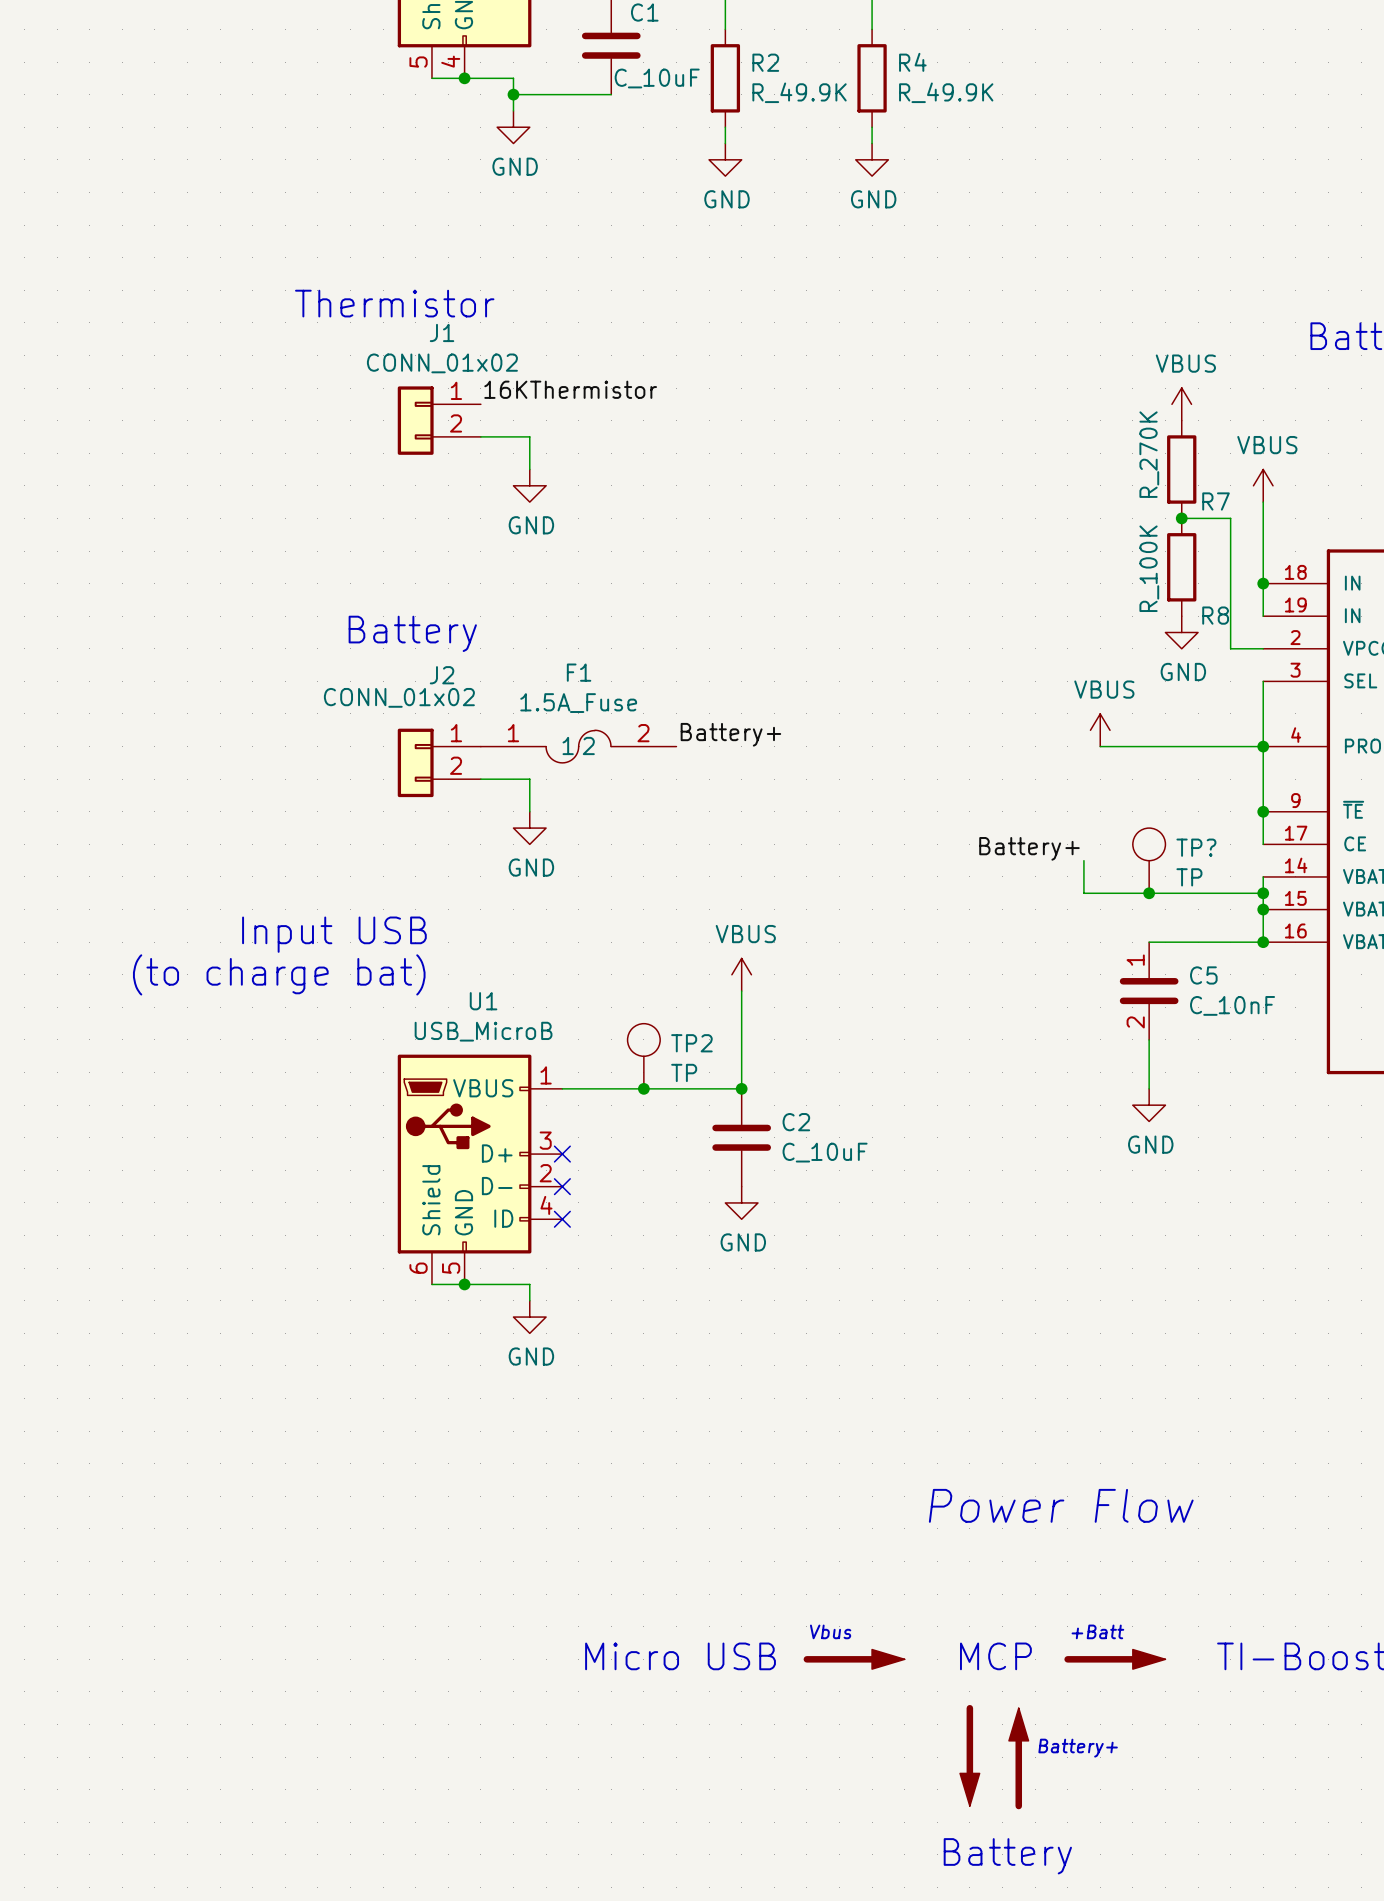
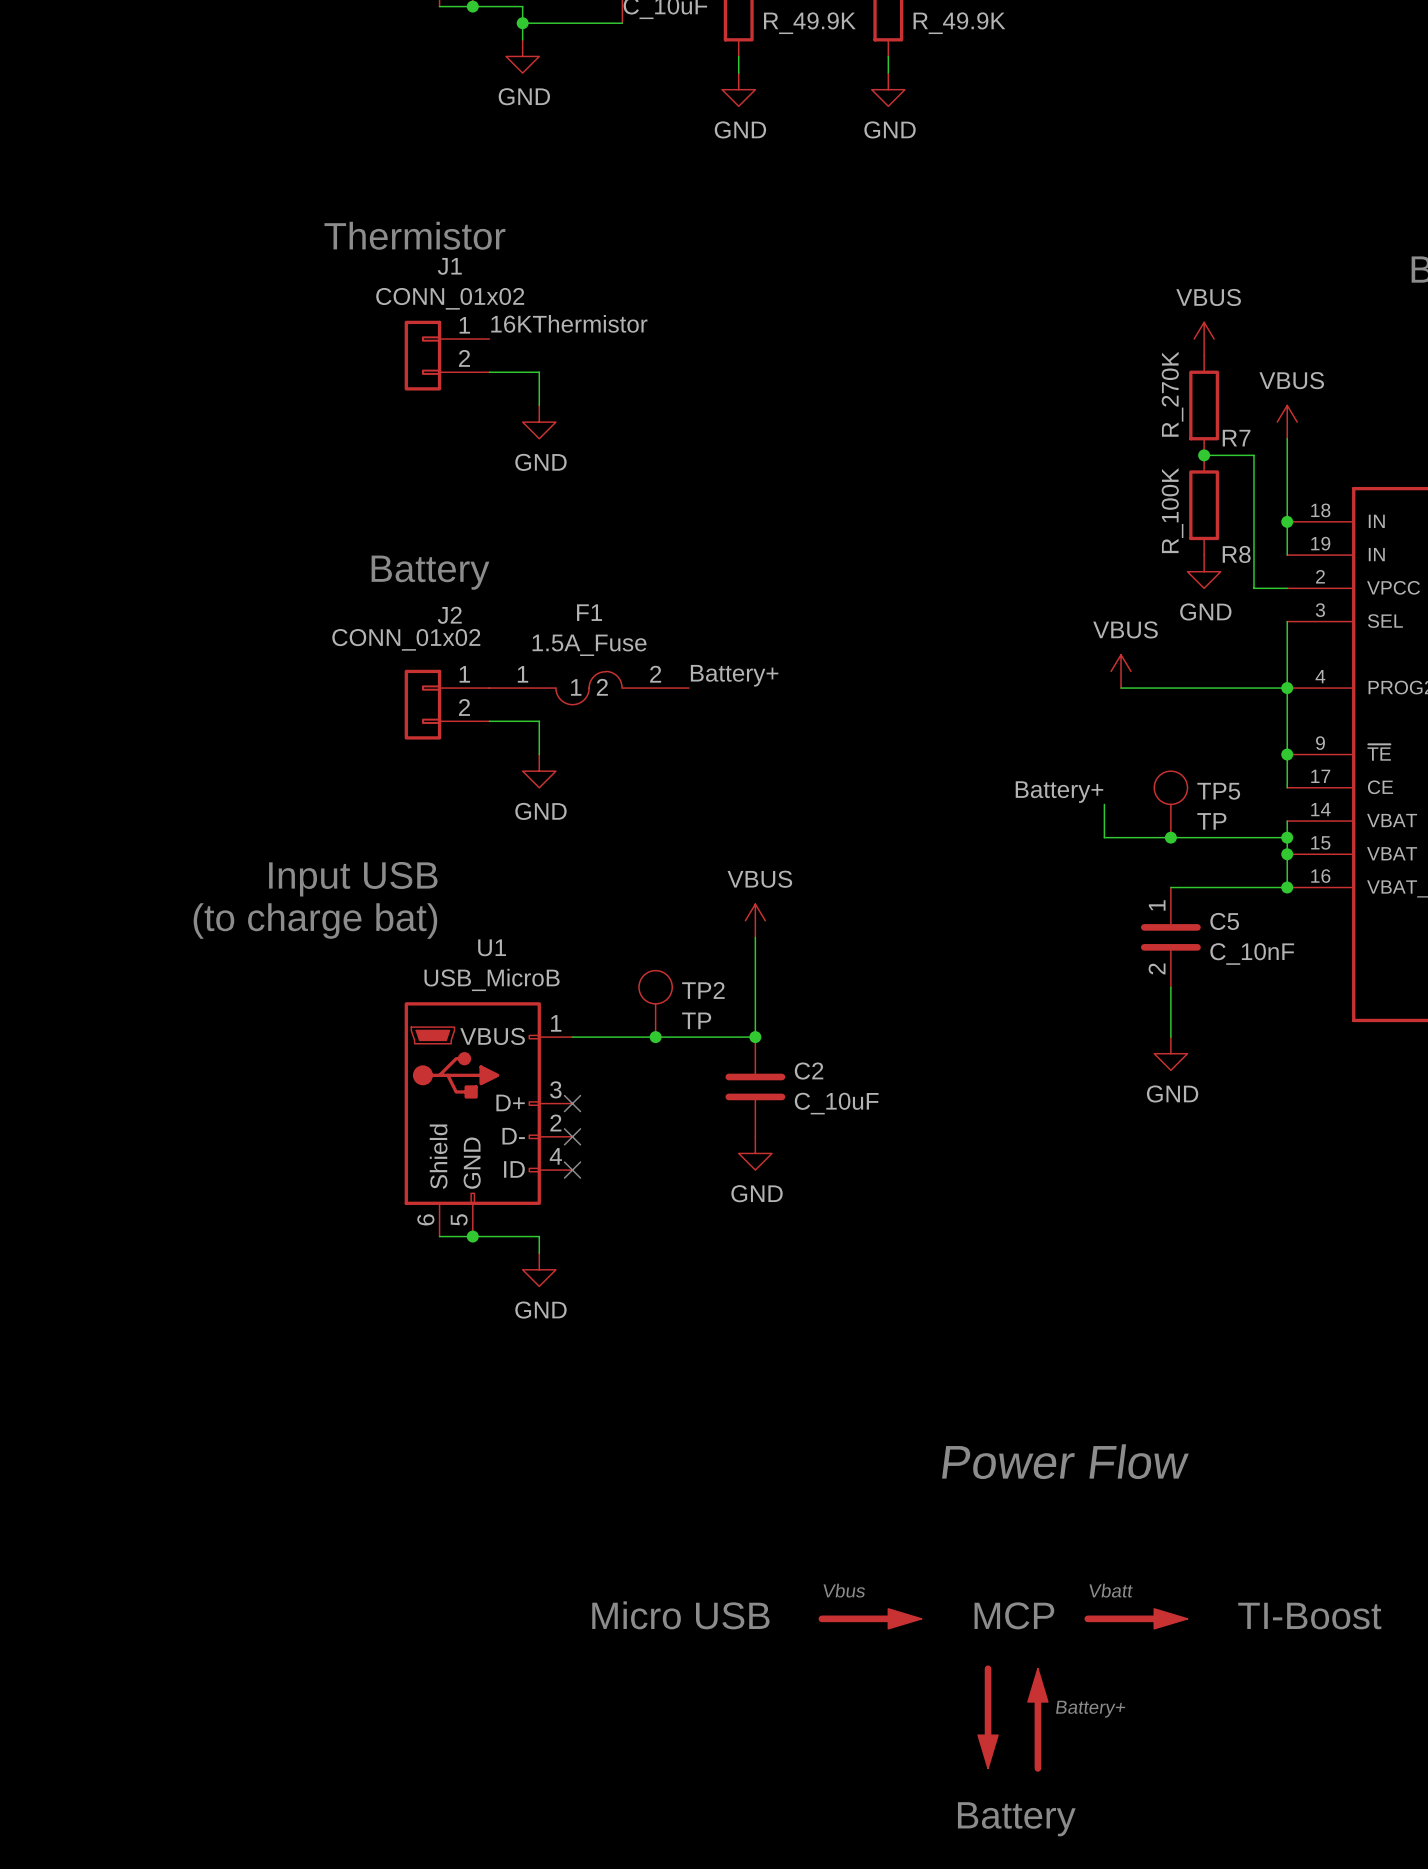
TP? name: TP? (1196, 847) -> TP5 (1218, 791)
text: +Batt (1097, 1631) -> Vbatt (1111, 1590)

